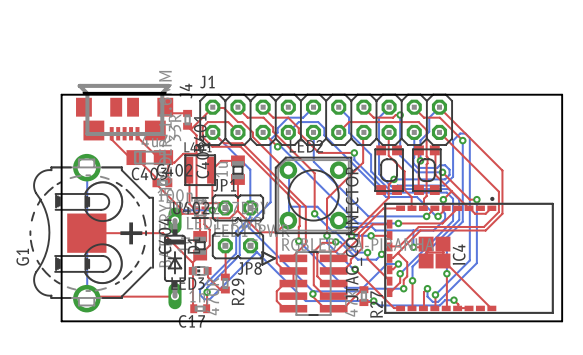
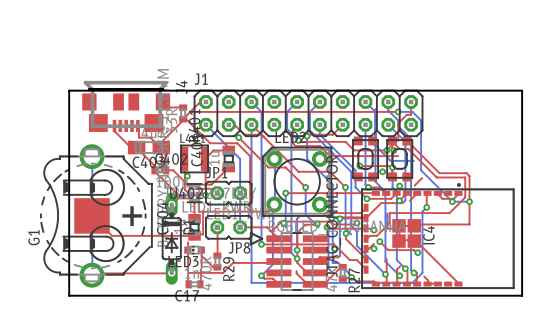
top track: none -> (205, 101) (200, 101) (157, 144) (161, 147)
top track: (237, 107) (247, 117) (263, 117) (273, 127) (273, 131) (314, 173) (314, 213) -> none
top track: (263, 107) (273, 117) (288, 117) (298, 128) (298, 132) (319, 152) (354, 152) -> none
bottom track: none -> (251, 101) (261, 111) (261, 244)
bottom track: (313, 107) (303, 117) (288, 117) (277, 128) (277, 132) (270, 139) (270, 202) (239, 233) (239, 255) (207, 287) (207, 292) -> (297, 101) (287, 111) (287, 129) (298, 140)
bottom track: (338, 107) (349, 117) (349, 132) (371, 154) (371, 171) (389, 189) (448, 189) (459, 199) (459, 219) (412, 266) (412, 280) -> (319, 101) (309, 111) (309, 130) (351, 171) (351, 225) (356, 231) (356, 245) (385, 274)
top track: (363, 107) (373, 117) (393, 117) (395, 115) (400, 115) -> none
bottom track: (389, 107) (379, 117) (379, 174) (391, 186) (444, 185) (453, 176) (453, 140) (460, 133) (465, 133) (469, 137) (469, 260) (435, 294) -> (365, 101) (375, 111) (375, 181) (385, 191) (385, 261) (399, 275)
top track: (414, 107) (423, 117) (439, 117) (462, 140) -> none
bottom track: none -> (388, 101) (388, 110) (398, 120) (398, 126) (411, 139) (411, 270) (413, 272)
top track: (439, 107) (502, 170) (502, 213) (485, 230) (420, 230) (393, 257) (389, 258) -> (392, 141) (399, 148) (408, 148) (436, 177) (465, 177) (465, 197) (449, 213) (389, 213) (389, 223) (376, 235) (369, 235) (366, 238)
top track: none -> (411, 101) (411, 114) (406, 114) (398, 123) (398, 140) (392, 141)
bottom track: (439, 107) (429, 117) (429, 131) (420, 140) (420, 160) -> none
via: (400, 115) -> none
top track: none -> (190, 111) (398, 111)
bottom track: none -> (398, 111) (412, 111) (421, 120) (421, 170) (452, 201) (469, 201)
via: none -> (398, 111)
top track: none -> (183, 119) (184, 117) (210, 143) (237, 143) (250, 156) (250, 211)
top track: (212, 132) (223, 143) (242, 143) (305, 206) (305, 243) (293, 258) -> (240, 227) (267, 227) (278, 238)
bottom track: (212, 132) (250, 169) (250, 217) (236, 231) (236, 253) (200, 289) (200, 294) (204, 299) (209, 299) (256, 252) -> (205, 124) (240, 158) (240, 227)
top track: (237, 132) (228, 122) (207, 122) (202, 127) (202, 137) (212, 146) (240, 146) (299, 205) (298, 241) -> (228, 124) (234, 124) (244, 134) (261, 134) (298, 171) (329, 171) (345, 187)
bottom track: none -> (251, 124) (251, 282) (412, 282) (422, 272) (422, 211) (426, 207)
bottom track: (288, 132) (298, 122) (318, 122) (324, 128) (324, 135) (386, 197) (416, 197) (438, 216) -> none
top track: none -> (297, 124) (292, 124) (292, 143) (295, 146) (319, 146) (329, 156) (398, 156)
bottom track: (313, 132) (313, 161) (368, 216) (426, 216) -> none
top track: (338, 132) (349, 122) (418, 122) (426, 130) (426, 196) (423, 198) (423, 208) -> (366, 198) (391, 198) (396, 193)
bottom track: none -> (319, 124) (319, 134) (355, 170) (355, 187) (366, 198)
top track: (363, 132) (363, 162) (327, 198) (327, 235) -> (342, 124) (332, 134) (307, 136)
top track: (389, 132) (388, 155) (404, 171) (404, 189) (411, 197) (412, 208) -> (368, 187) (379, 187) (386, 193)
bottom track: none -> (365, 124) (365, 184) (368, 187)
bottom track: (414, 132) (413, 163) (417, 167) (437, 167) (439, 165) (445, 165) (449, 169) (449, 174) (445, 179) (394, 179) -> (388, 124) (405, 141) (405, 200) (402, 203)
top track: (439, 132) (498, 191) (498, 212) (483, 226) (418, 226) (399, 246) (390, 246) (381, 254) -> none
top track: (137, 133) (138, 137) (157, 157) (163, 157) (169, 162) (174, 162) (183, 153) (196, 153) -> (137, 125) (138, 137) (150, 137) (161, 147) (161, 170) (173, 170) (191, 188)
bottom track: (462, 140) (462, 221) (446, 237) (446, 273) -> none
via: (462, 140) -> none
bottom track: none -> (291, 133) (291, 252) (297, 258)
bottom track: none -> (307, 136) (307, 158) (332, 184) (332, 262) (338, 262) (352, 277)
via: none -> (307, 136)
top track: none -> (238, 137) (268, 167) (285, 167) (305, 187)
via: none -> (238, 137)
bottom track: (277, 146) (281, 146) (357, 223) (398, 223) -> none
via: (277, 146) -> none
top track: none -> (298, 140) (345, 141) (354, 150) (386, 150) (394, 143) (392, 141)
via: none -> (298, 140)
top track: (434, 150) (435, 174) (475, 213) (485, 213) (491, 208) -> (437, 193) (442, 198) (453, 198) (458, 193)
top track: none -> (406, 141) (439, 173) (466, 173) (469, 176) (469, 224) (399, 225)
bottom track: (354, 152) (354, 159) (387, 193) (446, 192) (453, 198) (453, 220) (400, 273) -> none
via: (354, 152) -> none
via: none -> (386, 150)
top track: (288, 170) (285, 169) (252, 137) (252, 132) (242, 122) (237, 122) (223, 107) (212, 107) (191, 129) (187, 126) (196, 135) (196, 202) -> none
top track: (442, 172) (469, 199) (476, 199) -> none
via: (442, 172) -> none
top track: none -> (359, 166) (392, 167)
via: none -> (359, 166)
top track: (237, 179) (237, 211) (259, 232) (276, 232) (276, 263) (283, 270) (293, 271) (293, 283) (283, 284) (276, 291) (276, 301) (283, 308) (293, 308) -> (261, 275) (264, 278) (272, 278) (278, 284)
top track: none -> (228, 167) (211, 184) (187, 184)
top track: (394, 179) (388, 184) (388, 197) (335, 251) (319, 251) (317, 253) (317, 276) (324, 283) (333, 283) -> (338, 257) (319, 257) (315, 261)
via: (394, 179) -> none
bottom track: none -> (392, 167) (392, 187) (396, 191) (396, 260) (405, 268)
via: none -> (392, 167)
via: none -> (382, 171)
via: none -> (187, 176)
bottom track: (443, 199) (445, 219) (433, 230) (375, 230) (371, 226) (345, 226) (338, 219) (330, 219) (317, 206) (289, 206) -> none
via: (443, 199) -> none
bottom track: (476, 199) (476, 263) (438, 301) (432, 301) (427, 296) (427, 288) -> none
via: (476, 199) -> none
via: none -> (399, 186)
bottom track: none -> (305, 187) (305, 214) (318, 227)
via: none -> (305, 187)
bottom track: none -> (345, 187) (345, 228) (351, 234)
via: none -> (345, 187)
via: none -> (368, 187)
bottom track: none -> (285, 193) (285, 227)
via: none -> (285, 193)
top track: (400, 208) (383, 208) (358, 233) (358, 238) (339, 257) (333, 258) -> (375, 193) (285, 193)
top track: (457, 208) (442, 223) (398, 223) -> (427, 193) (426, 207)
top track: (237, 210) (230, 218) (204, 218) -> none
top track: (203, 213) (204, 224) (209, 229) (209, 245) (193, 262) (163, 233) (86, 233) -> (203, 211) (203, 234) (194, 235) (111, 235) (91, 215)
top track: none -> (197, 197) (198, 211) (267, 211) (273, 205)
bottom track: (314, 213) (356, 252) (367, 252) -> none
via: (314, 213) -> none
via: none -> (366, 198)
via: (438, 216) -> none
via: none -> (452, 201)
via: none -> (469, 201)
top track: none -> (402, 203) (381, 203) (366, 218) (339, 218)
bottom track: none -> (273, 205) (272, 264) (261, 275)
via: (398, 223) -> none
via: none -> (426, 207)
top track: (389, 224) (372, 224) (362, 234) (362, 248) (350, 259) (350, 263) (343, 270) (333, 270) -> (366, 207) (361, 213) (325, 213) (322, 215) (299, 215)
bottom track: (247, 225) (312, 291) (312, 293) (313, 291) (364, 291) (367, 288) (403, 288) -> none
bottom track: none -> (299, 215) (297, 218) (297, 250)
bottom track: (327, 235) (327, 242) (355, 269) -> none
via: (327, 235) -> none
via: (371, 235) -> none
bottom track: none -> (339, 218) (338, 257)
via: none -> (339, 218)
bottom track: (298, 241) (345, 287) (363, 287) (386, 264) (398, 264) -> none
bottom track: (335, 241) (340, 241) (357, 259) (376, 259) (381, 254) -> none
top track: none -> (356, 223) (332, 224) (329, 221) (281, 221) (271, 231)
via: none -> (356, 223)
top track: (442, 244) (442, 260) (491, 308) -> (399, 241) (416, 241) (458, 284)
bottom track: (250, 245) (305, 301) (374, 301) (379, 305) (439, 305) (445, 300) (453, 300) -> none
top track: none -> (327, 227) (374, 230)
bottom track: none -> (327, 227) (328, 268) (332, 272)
via: none -> (327, 227)
via: (413, 247) -> none
via: none -> (374, 230)
top track: (426, 252) (443, 252) -> none
top track: (397, 253) (407, 262) (407, 276) (403, 279) (403, 288) -> none
via: (381, 254) -> none
top track: none -> (379, 241) (388, 250) (413, 250) (416, 252)
via: none -> (379, 241)
via: none -> (261, 244)
via: (398, 264) -> none
top track: (355, 269) (394, 308) (400, 308) -> (352, 277) (356, 281) (374, 281) (375, 284)
via: none -> (374, 248)
via: none -> (297, 250)
top track: (400, 273) (400, 282) (389, 292) -> (261, 244) (334, 244) (349, 260) (356, 260) (366, 269)
via: (400, 273) -> none
top track: (446, 273) (446, 308) -> (413, 272) (416, 272) (417, 284)
via: none -> (297, 258)
via: (412, 280) -> none
top track: none -> (278, 261) (233, 262) (223, 272) (188, 272)
via: (403, 288) -> none
via: (427, 288) -> none
via: none -> (405, 268)
via: (207, 292) -> none
via: (312, 293) -> none
via: (435, 294) -> none
via: none -> (413, 272)
via: none -> (385, 274)
via: none -> (261, 275)
via: none -> (399, 275)
via: (453, 300) -> none

